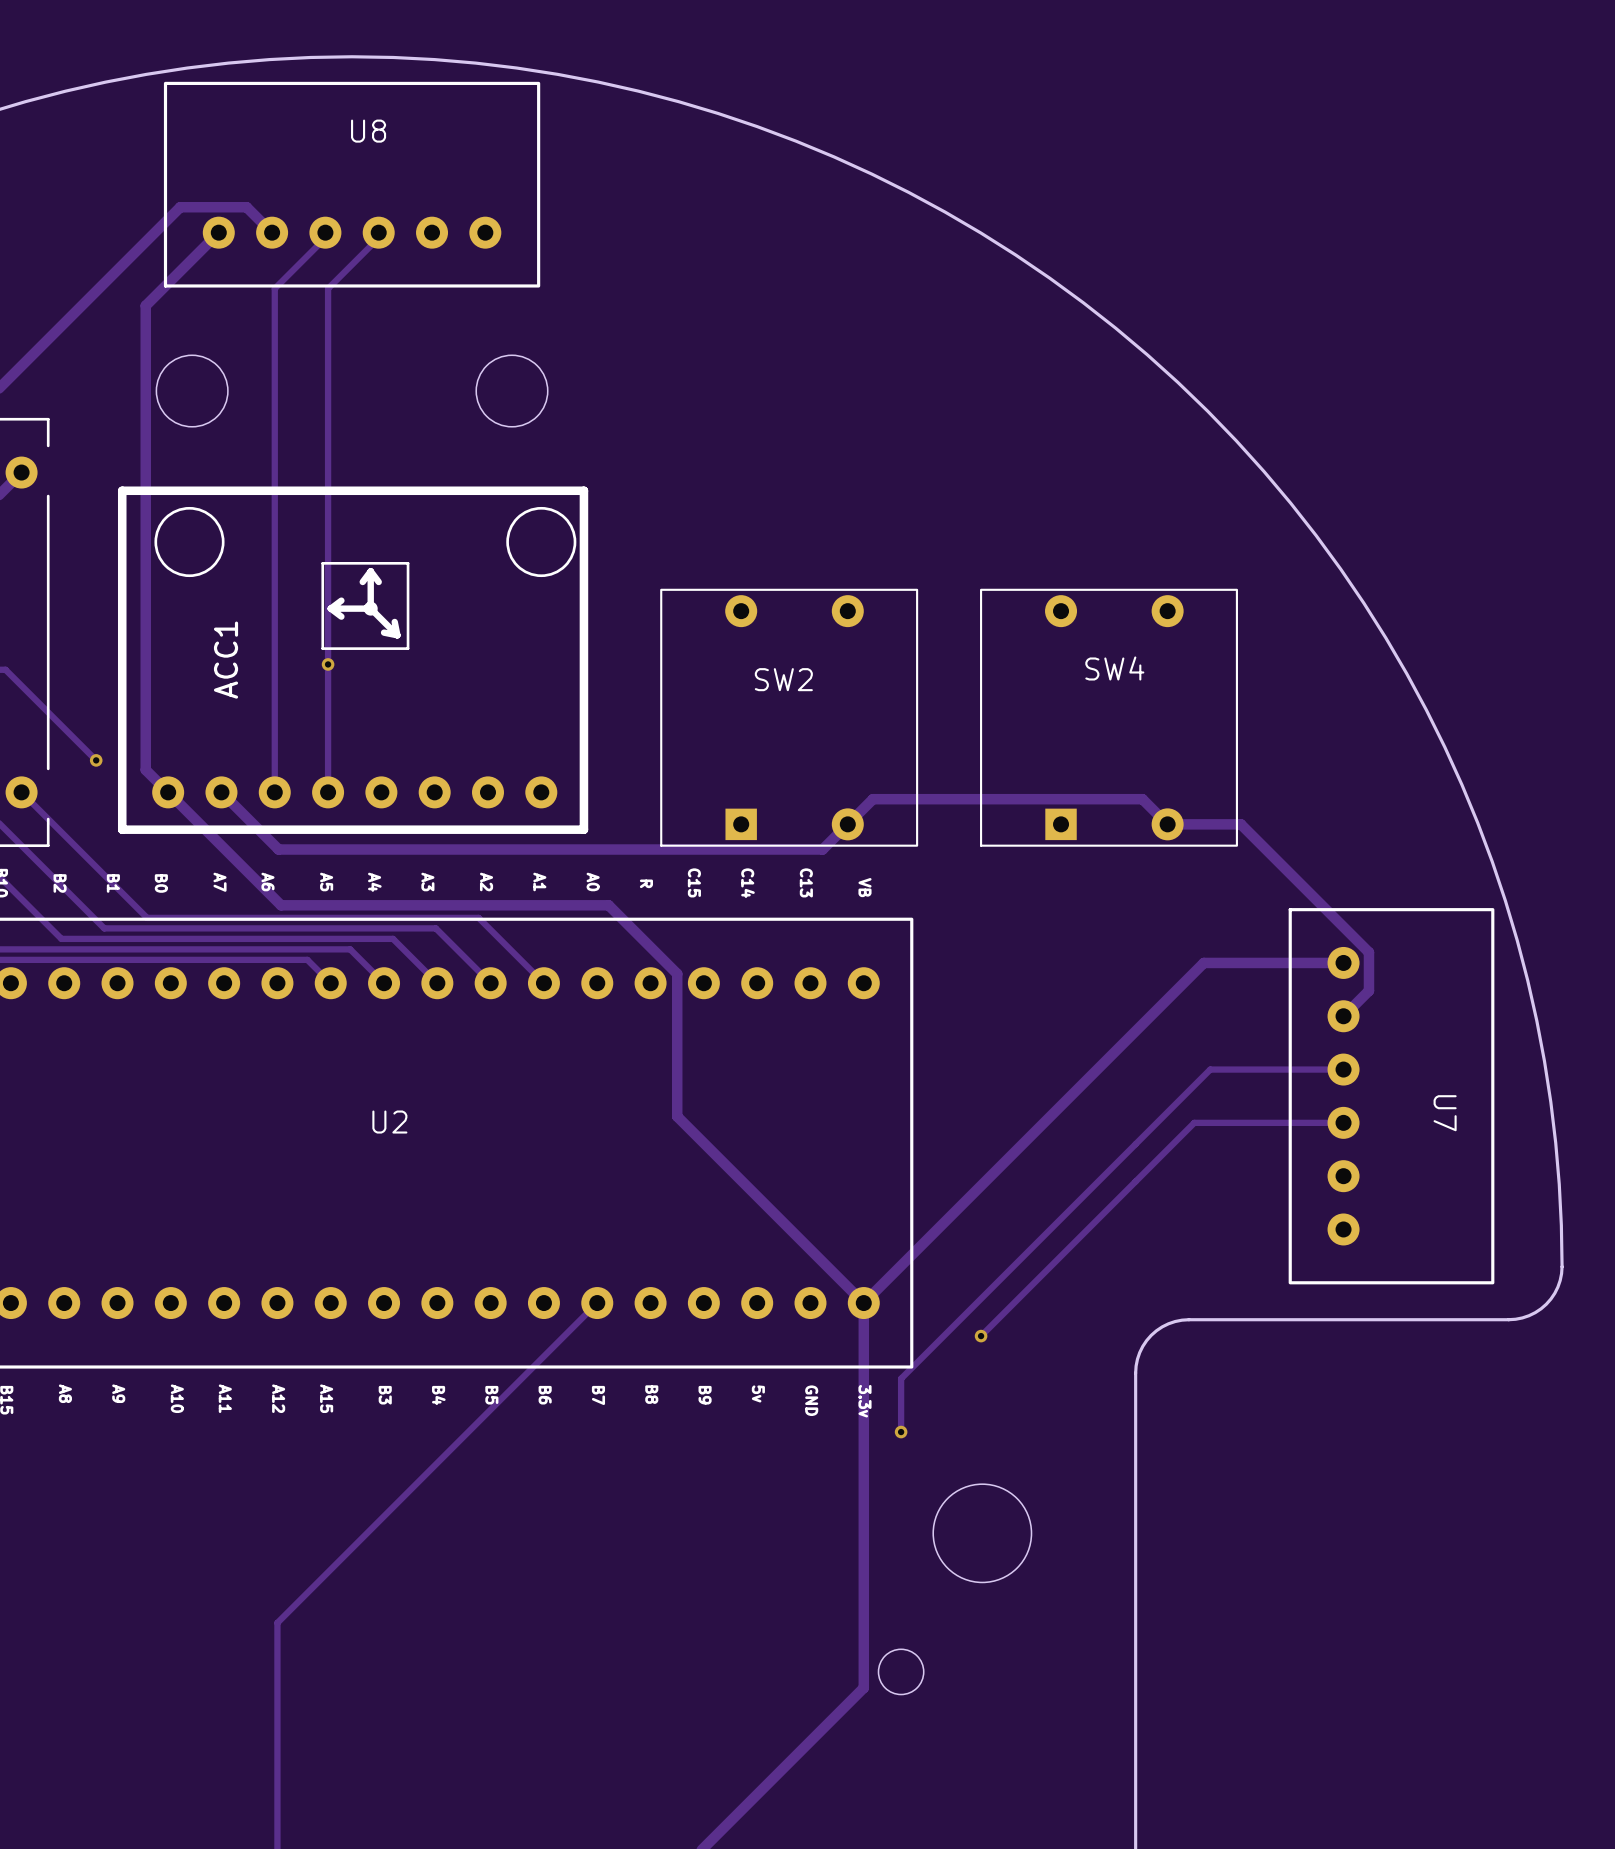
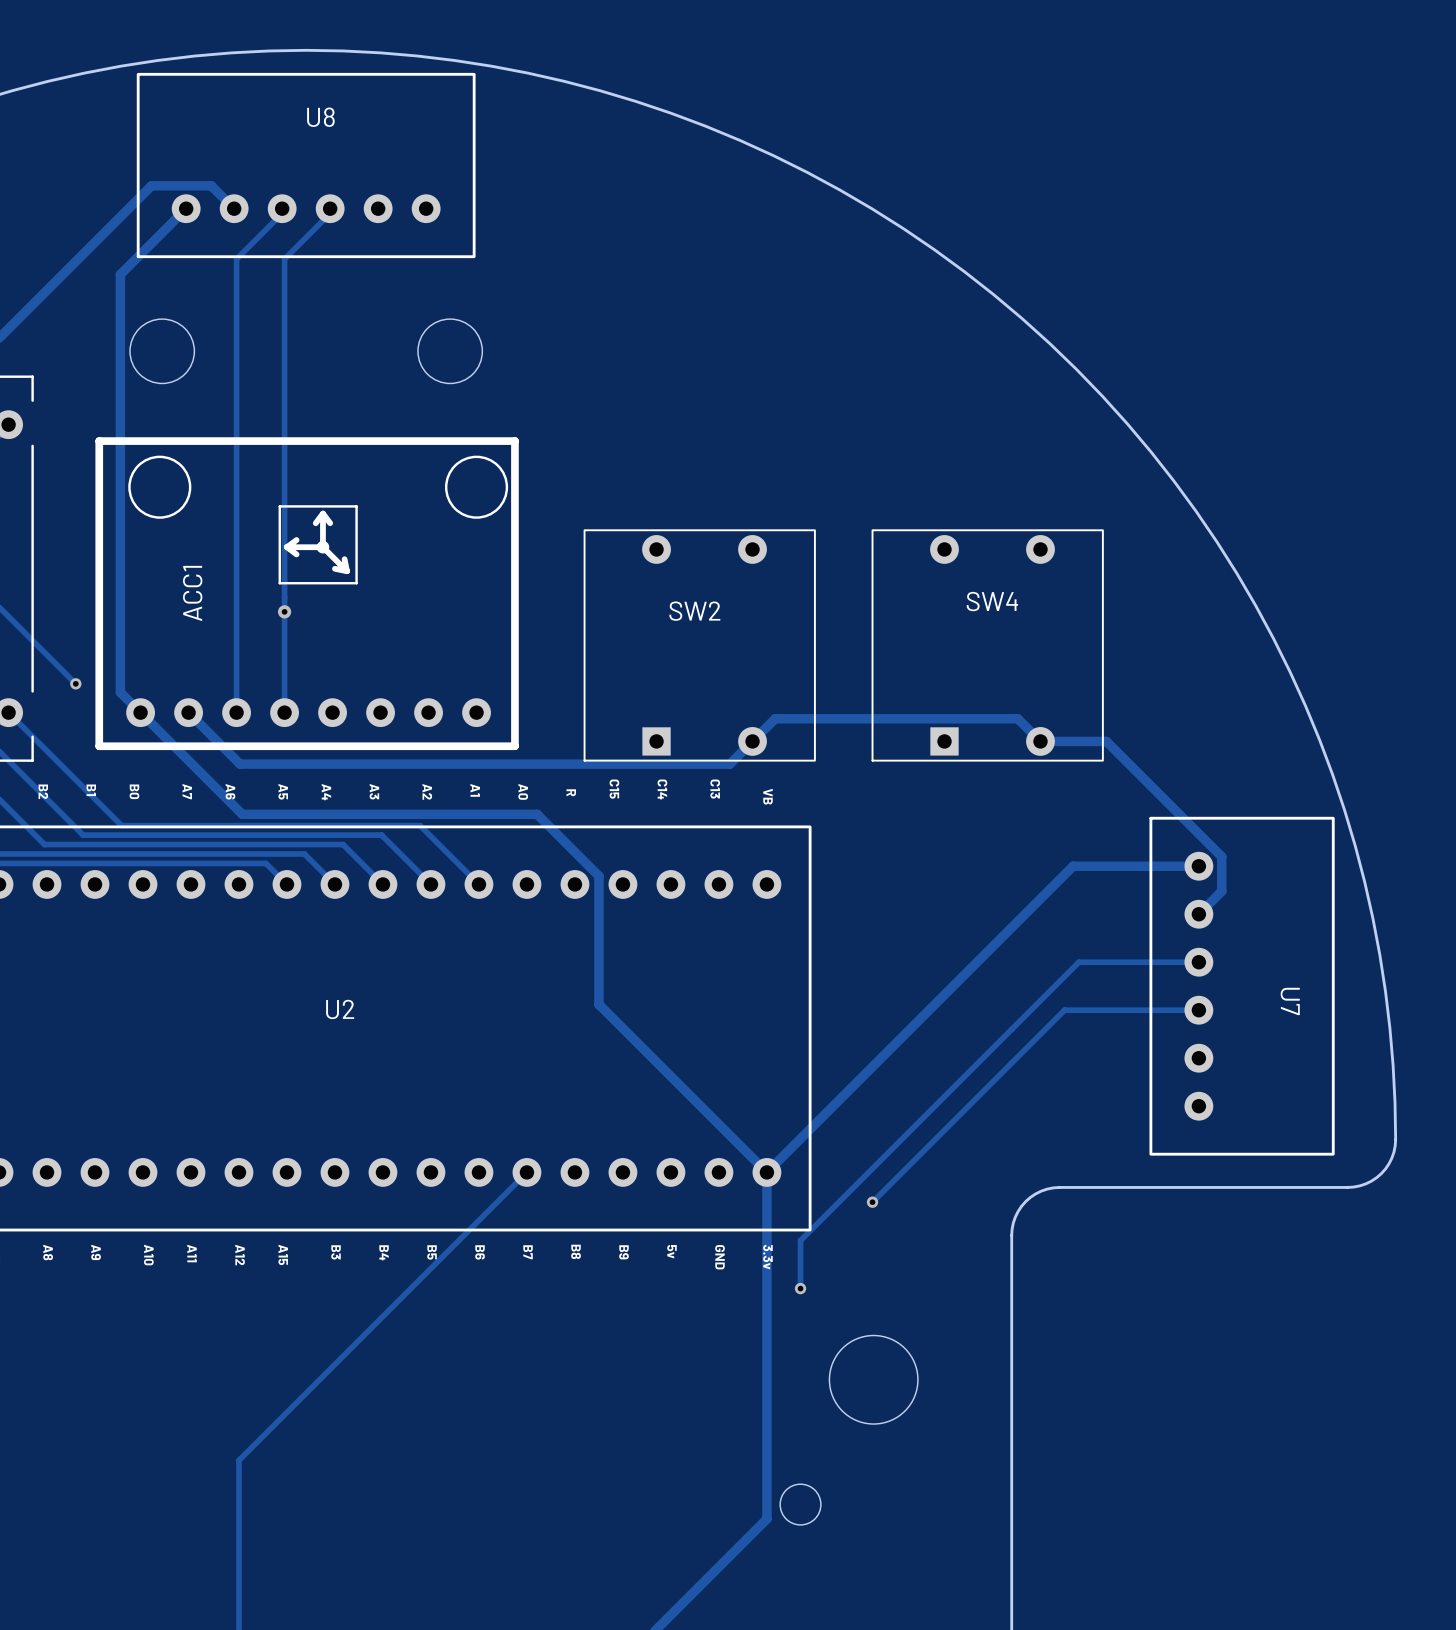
via: (328, 664) -> none
via: none -> (284, 611)

